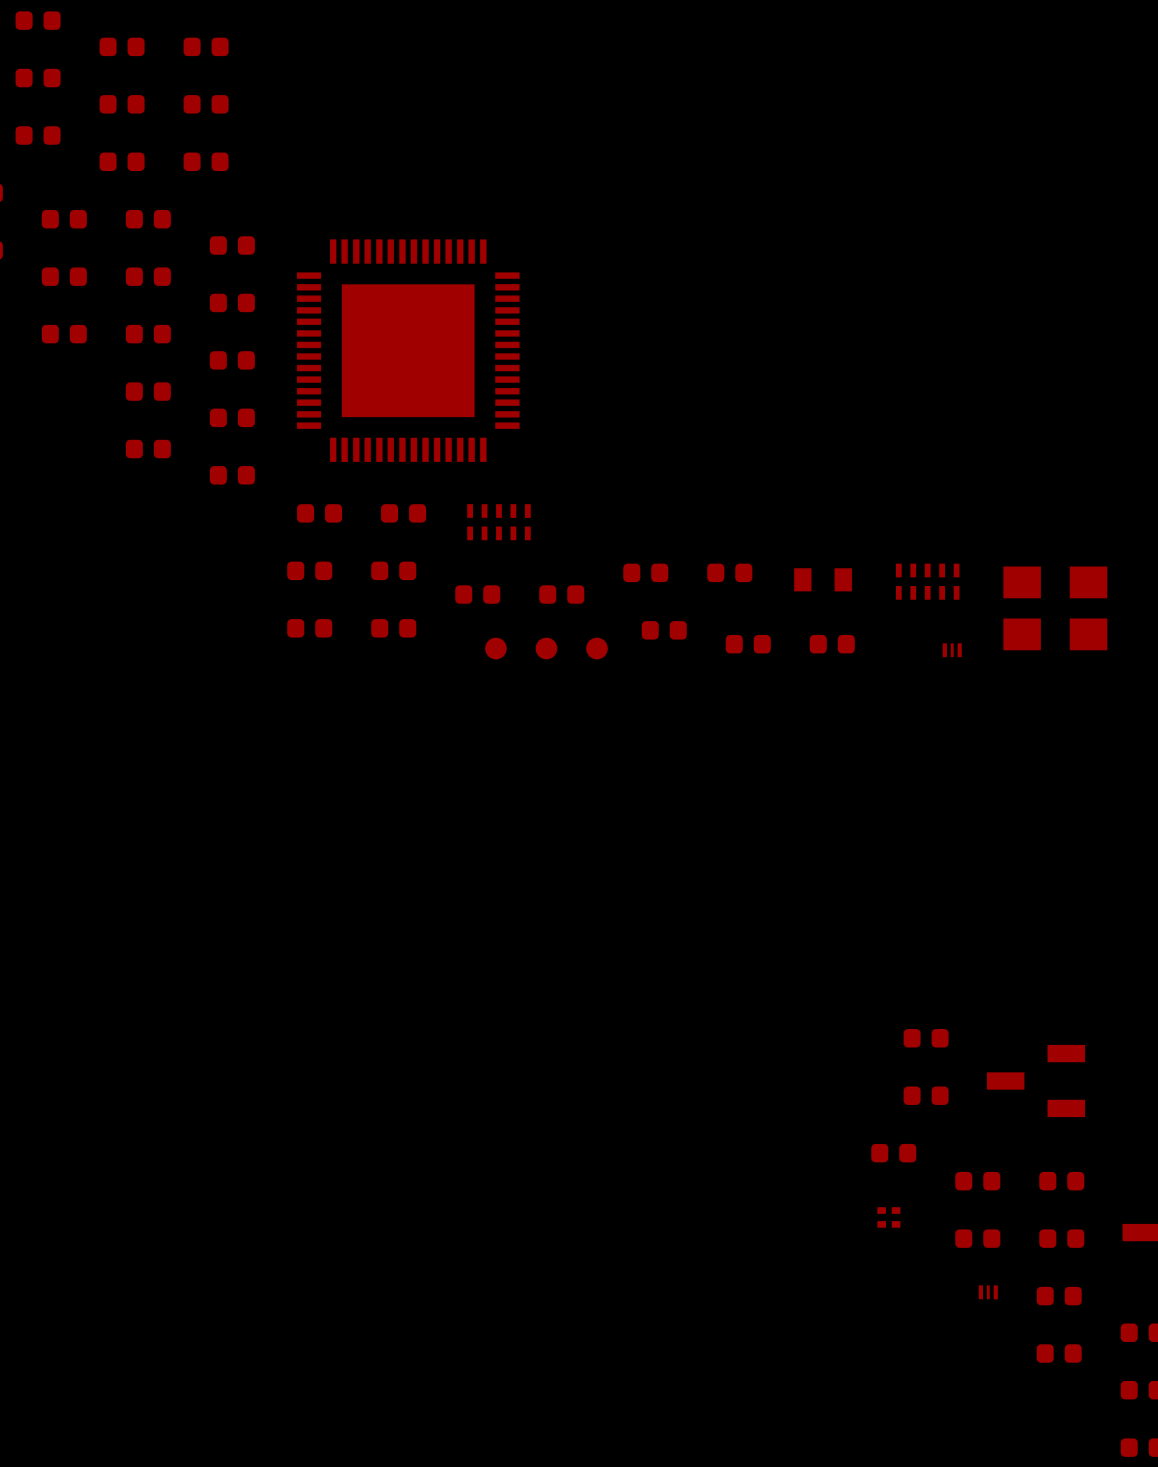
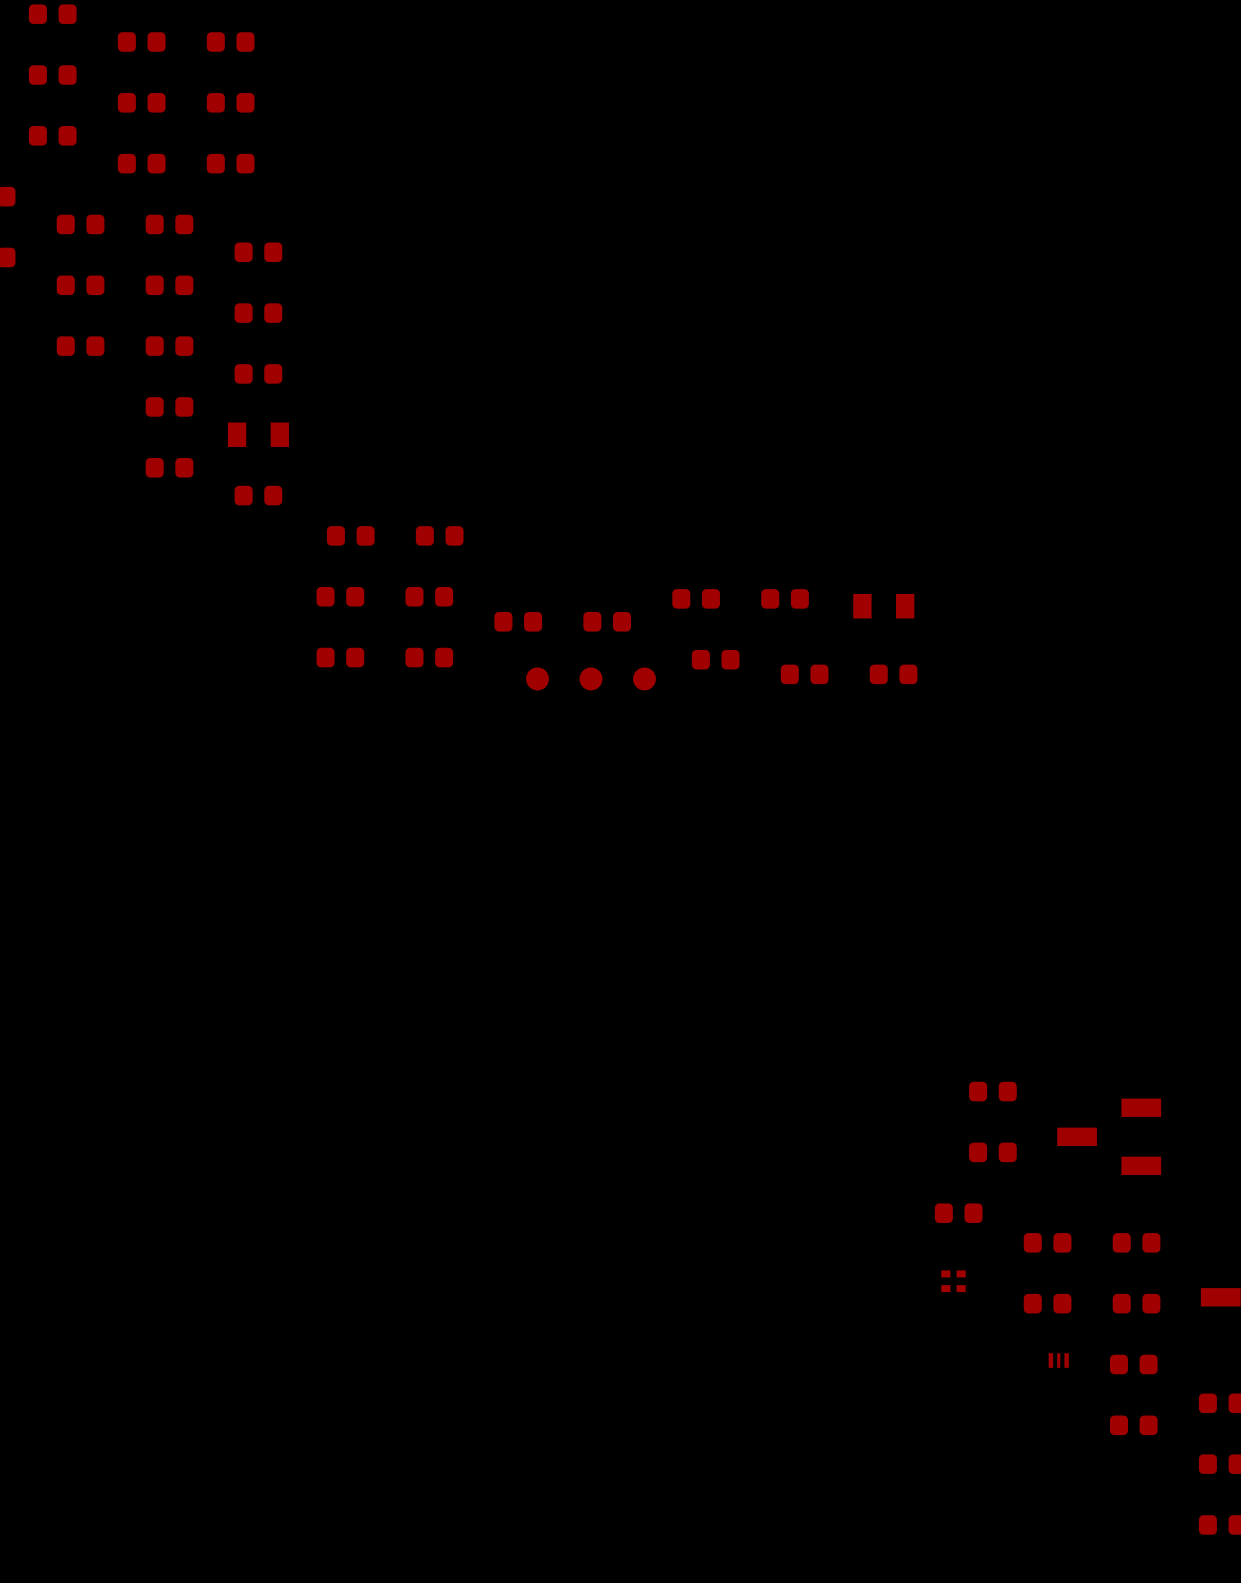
part: (408, 350) -> none
part footprint: [209, 408, 255, 428] -> [227, 422, 290, 447]
part: (498, 522) -> none
part: (927, 581) -> none
part: (1055, 608) -> none
part: (952, 650) -> none

